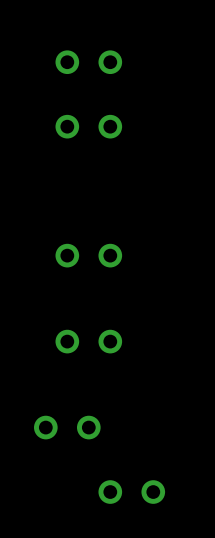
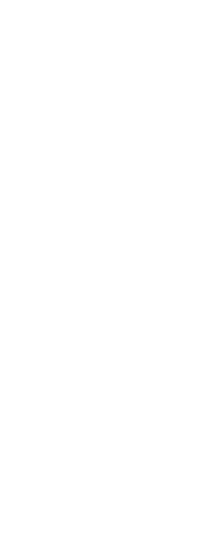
part: (88, 62) -> none
part: (88, 126) -> none
part: (88, 255) -> none
part: (88, 341) -> none
part: (67, 427) -> none
part: (131, 492) -> none

